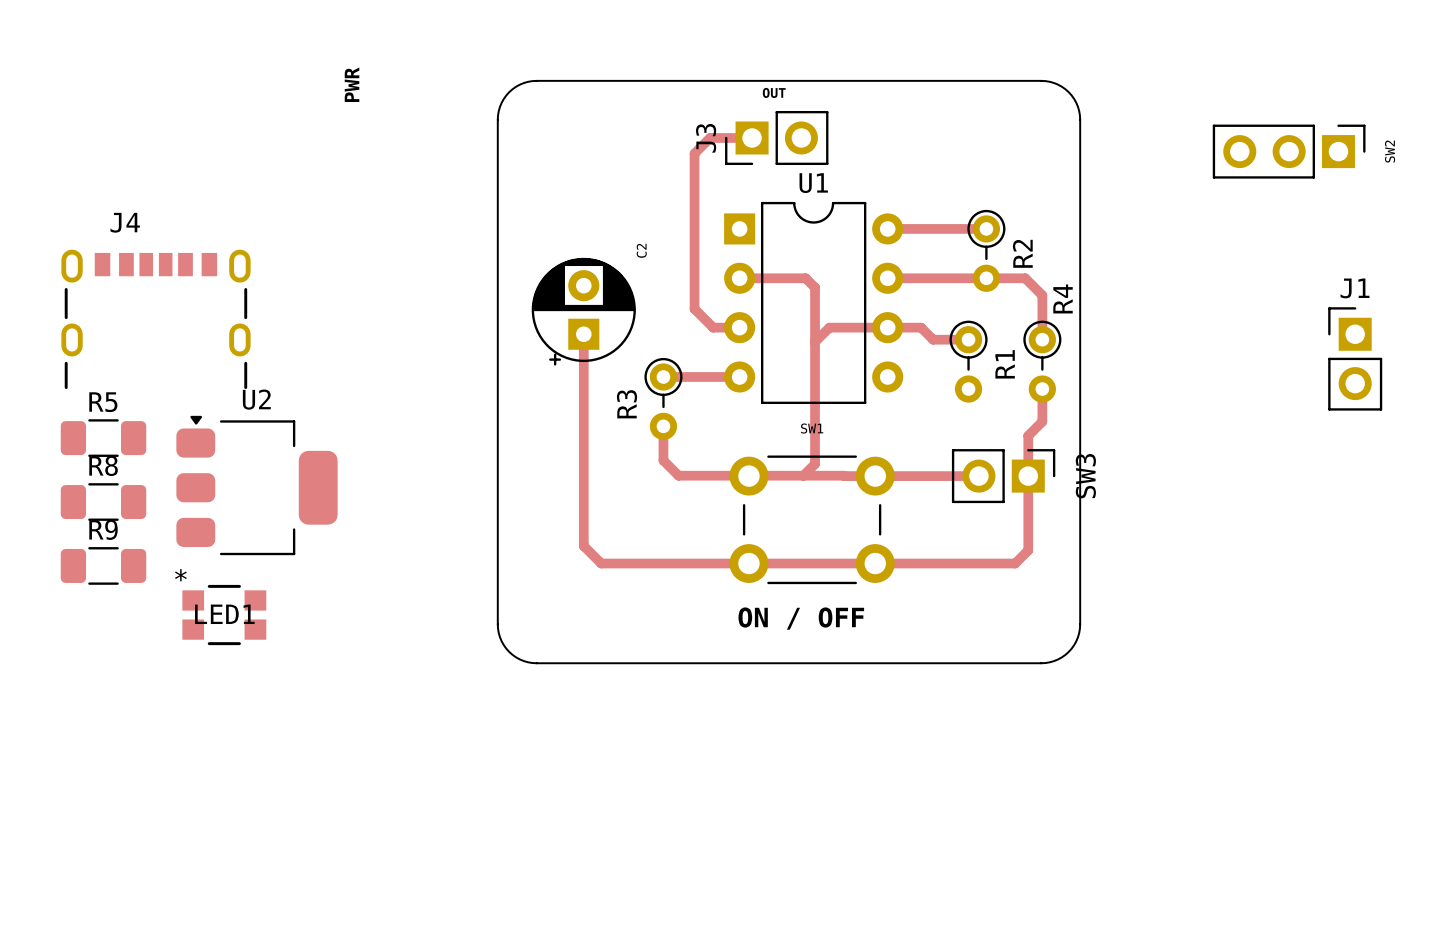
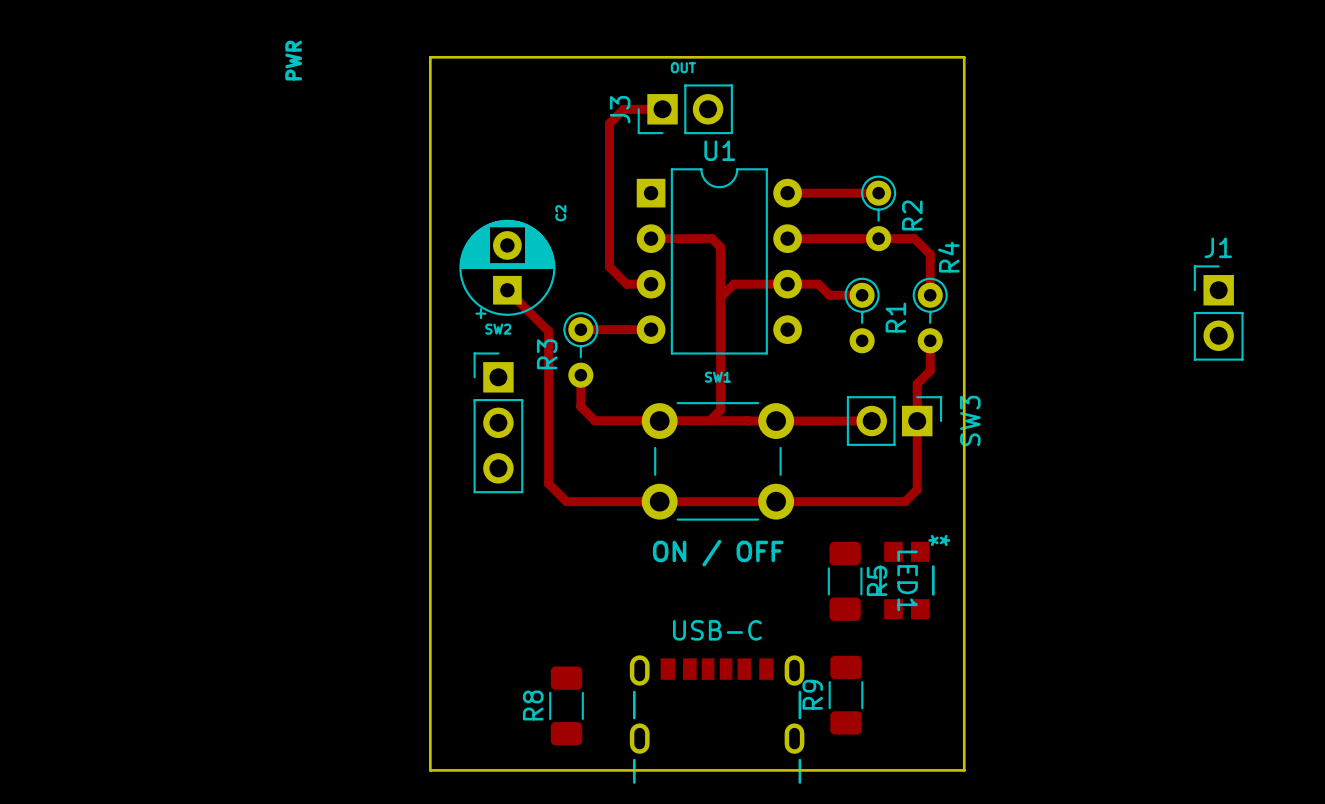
board edge: (536, 80) (1041, 80) (1058, 84) (1068, 92) (1076, 102) (1080, 119) (1080, 624) (1076, 641) (1068, 651) (1058, 659) (1041, 663) (536, 663) (519, 659) (509, 651) (501, 641) (497, 624) (497, 119) (501, 102) (509, 92) (519, 84) (536, 80) -> (430, 57) (430, 770) (964, 770) (964, 57) (430, 57)
SW2 rotation: 0° (1289, 151) -> 90° counterclockwise (498, 422)
SW2 position: (1289, 151) -> (498, 422)
J4: (155, 319) -> none
track: (583, 334) (583, 546) (601, 563) (647, 563) -> (507, 290) (548, 331) (548, 483) (566, 501)
R5 rotation: 0° (103, 438) -> 90° clockwise (845, 581)
R5 position: (103, 438) -> (845, 581)
R8 name position: R8 (103, 465) -> R8 (533, 705)
U2: (257, 485) -> none
R8 rotation: 0° (103, 502) -> 90° clockwise (566, 705)
R8 position: (103, 502) -> (566, 705)
R9 name position: R9 (103, 529) -> R9 (812, 694)
R9 rotation: 0° (103, 565) -> 90° clockwise (846, 695)
R9 position: (103, 565) -> (846, 695)
LED1 rotation: 0° (224, 615) -> 90° clockwise (906, 580)
LED1 position: (224, 615) -> (906, 580)
USB-C: none -> (717, 719)

